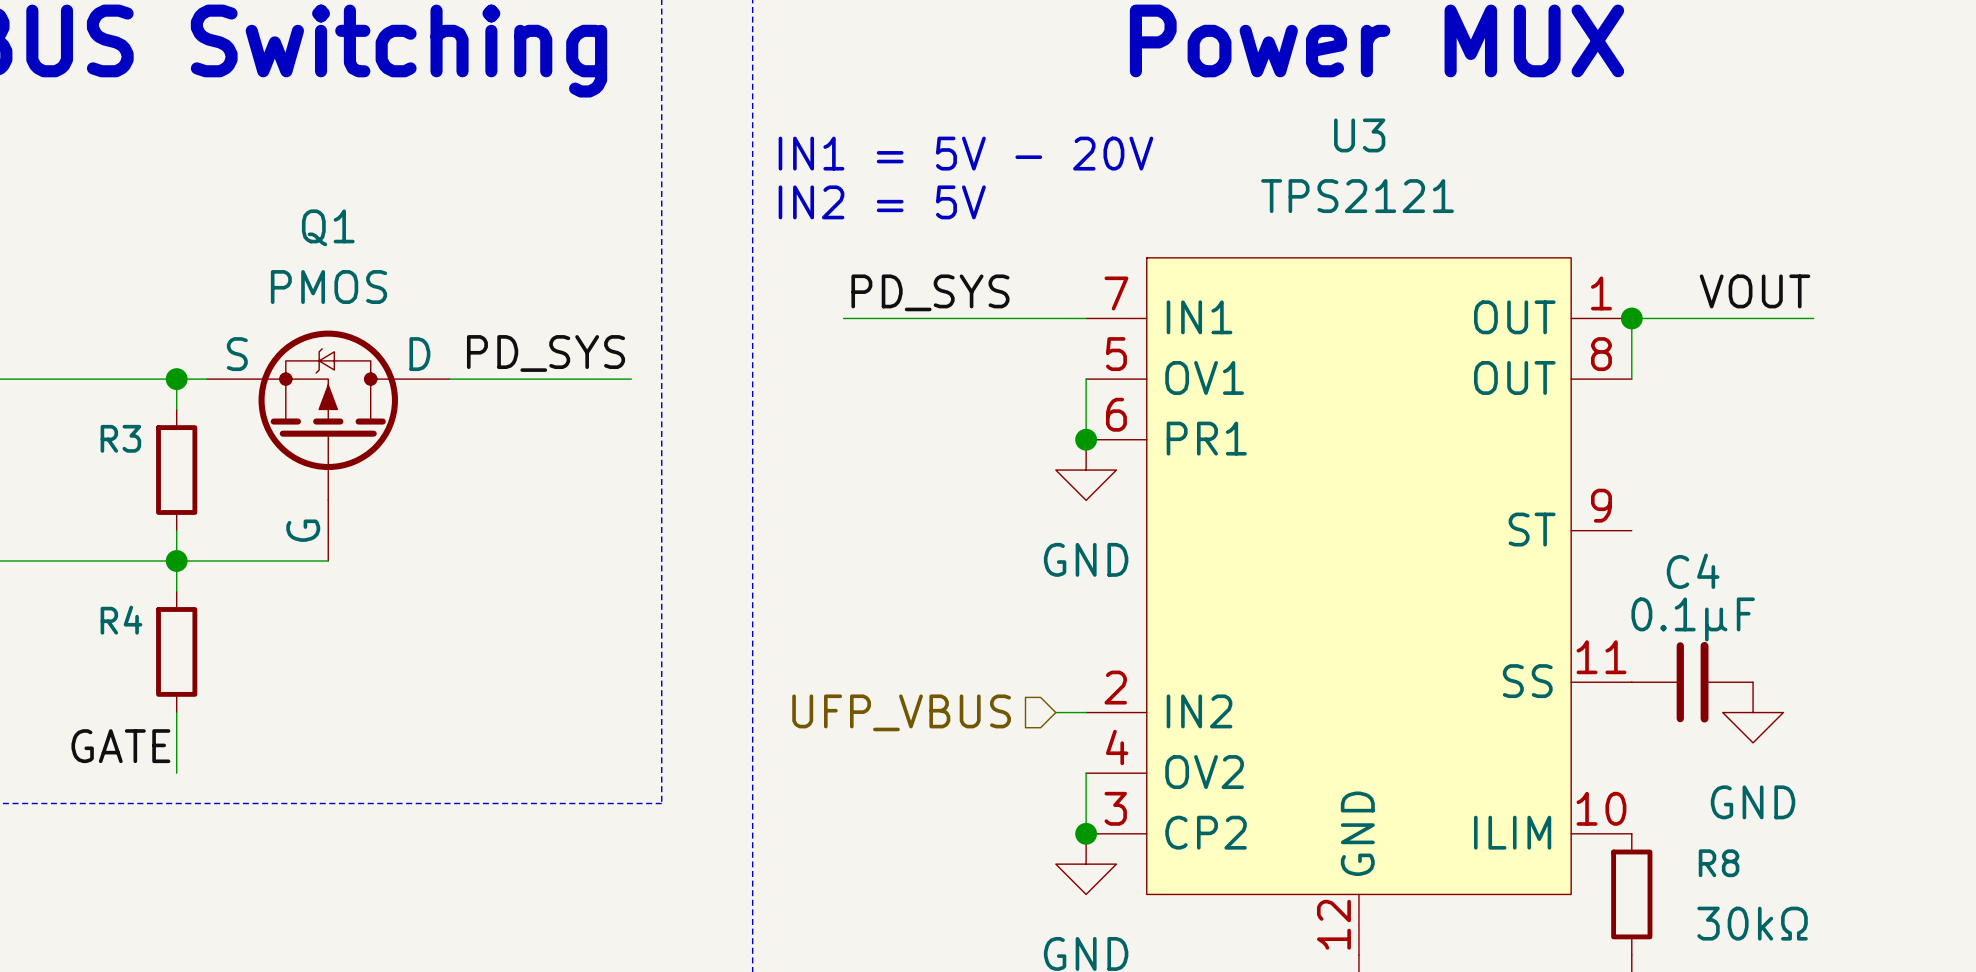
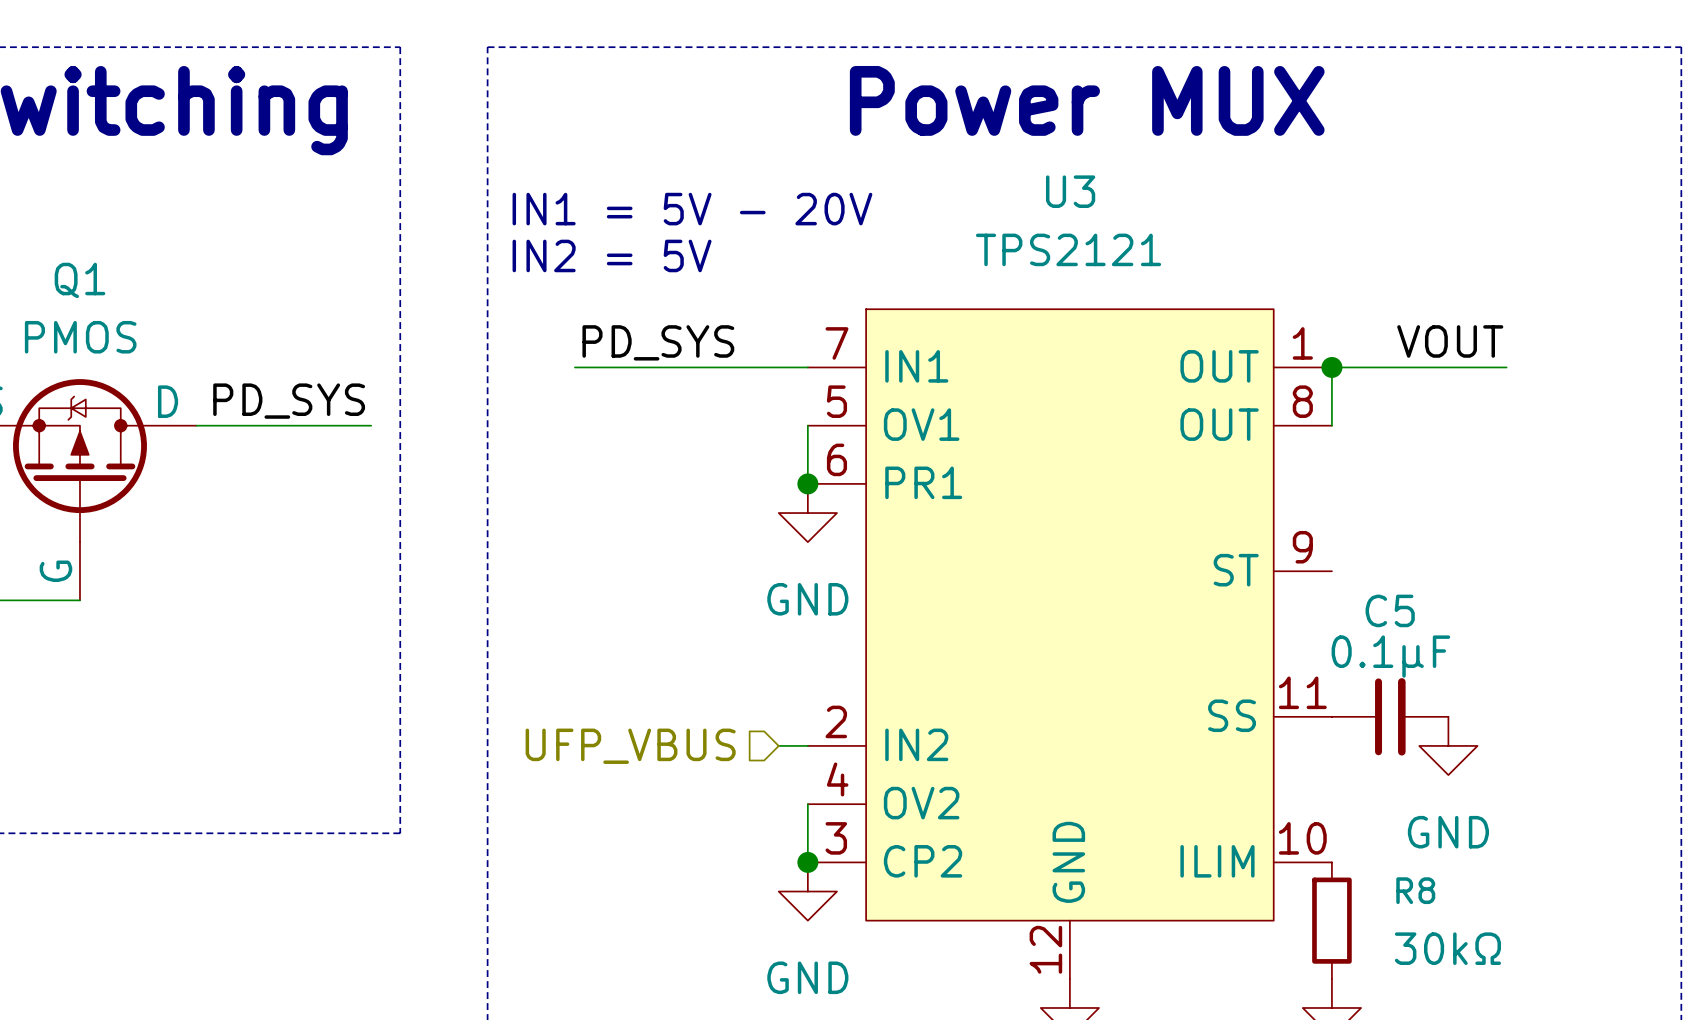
C4 name: C4 (1693, 571) -> C5 (1390, 610)

